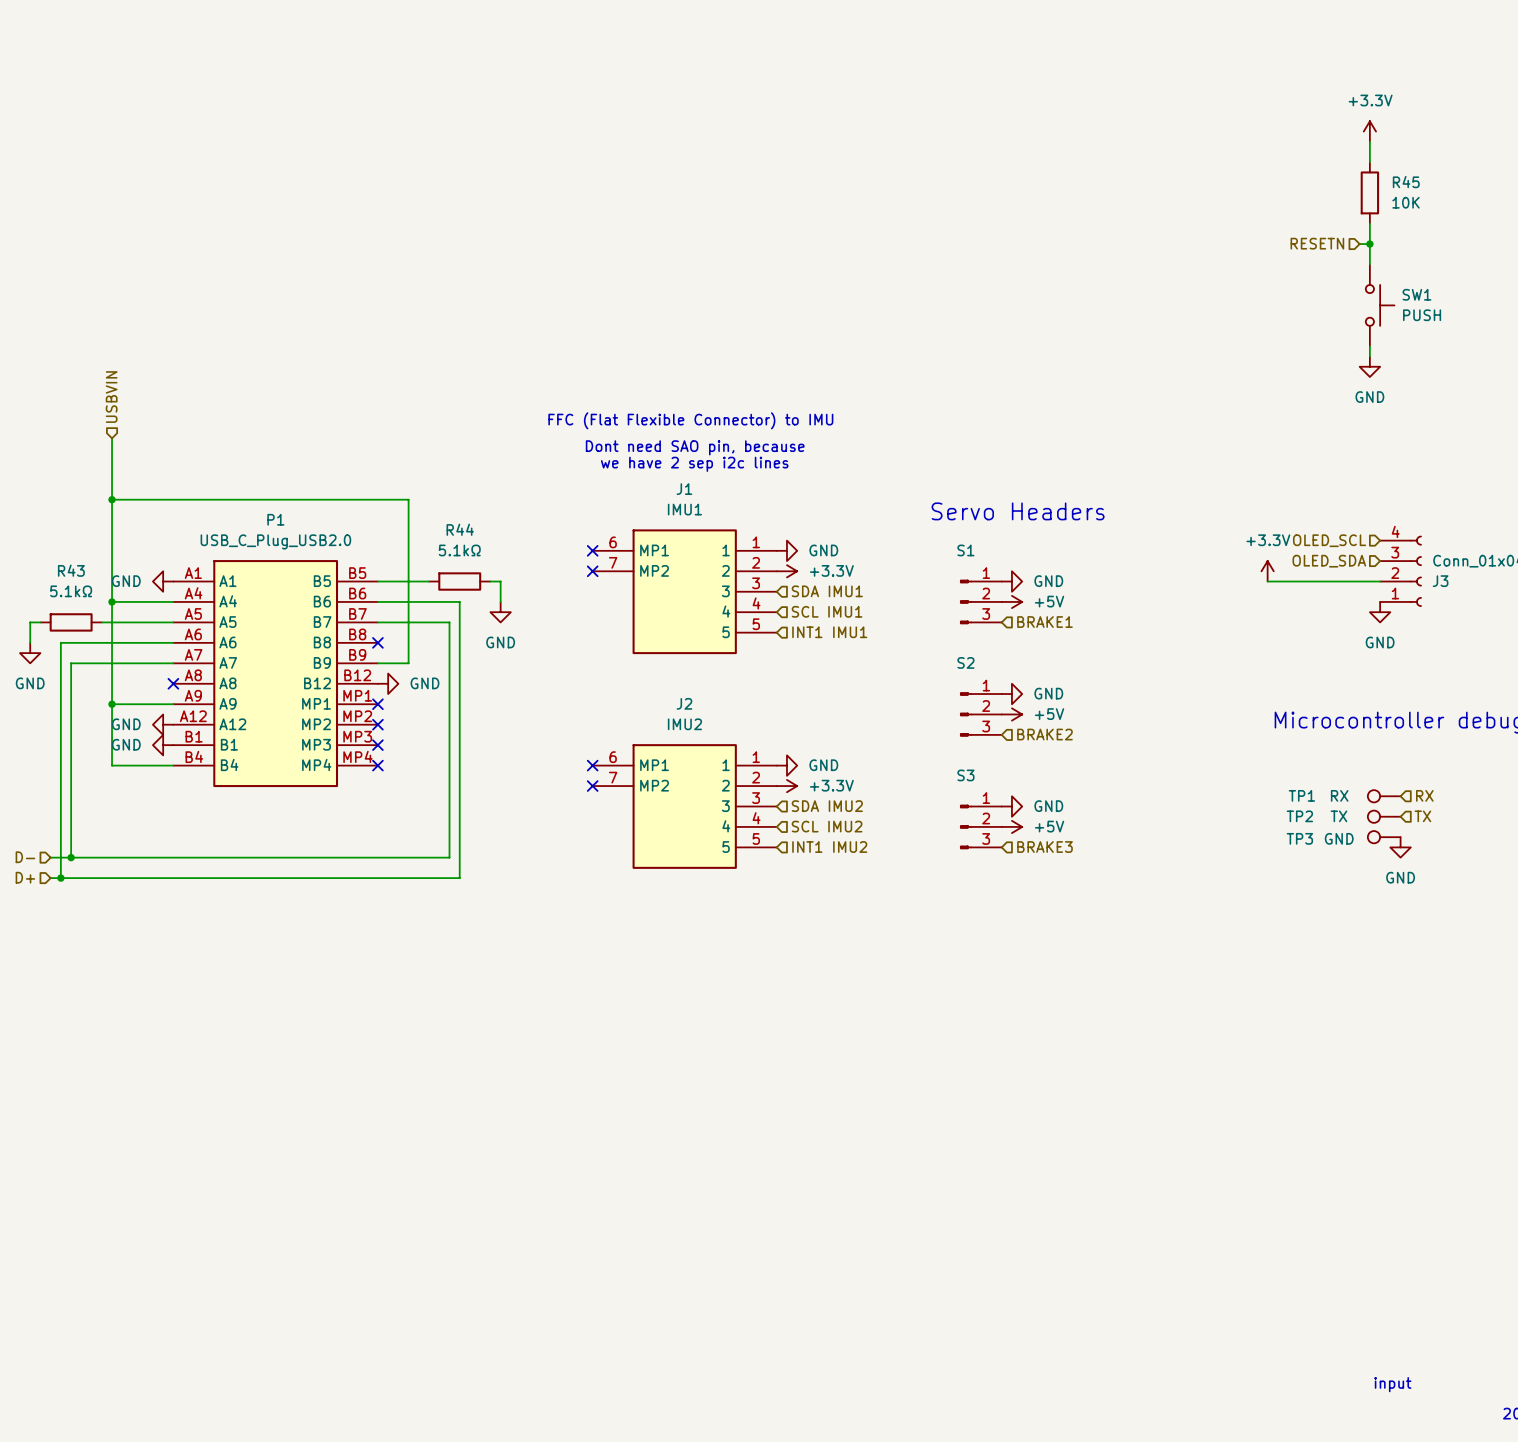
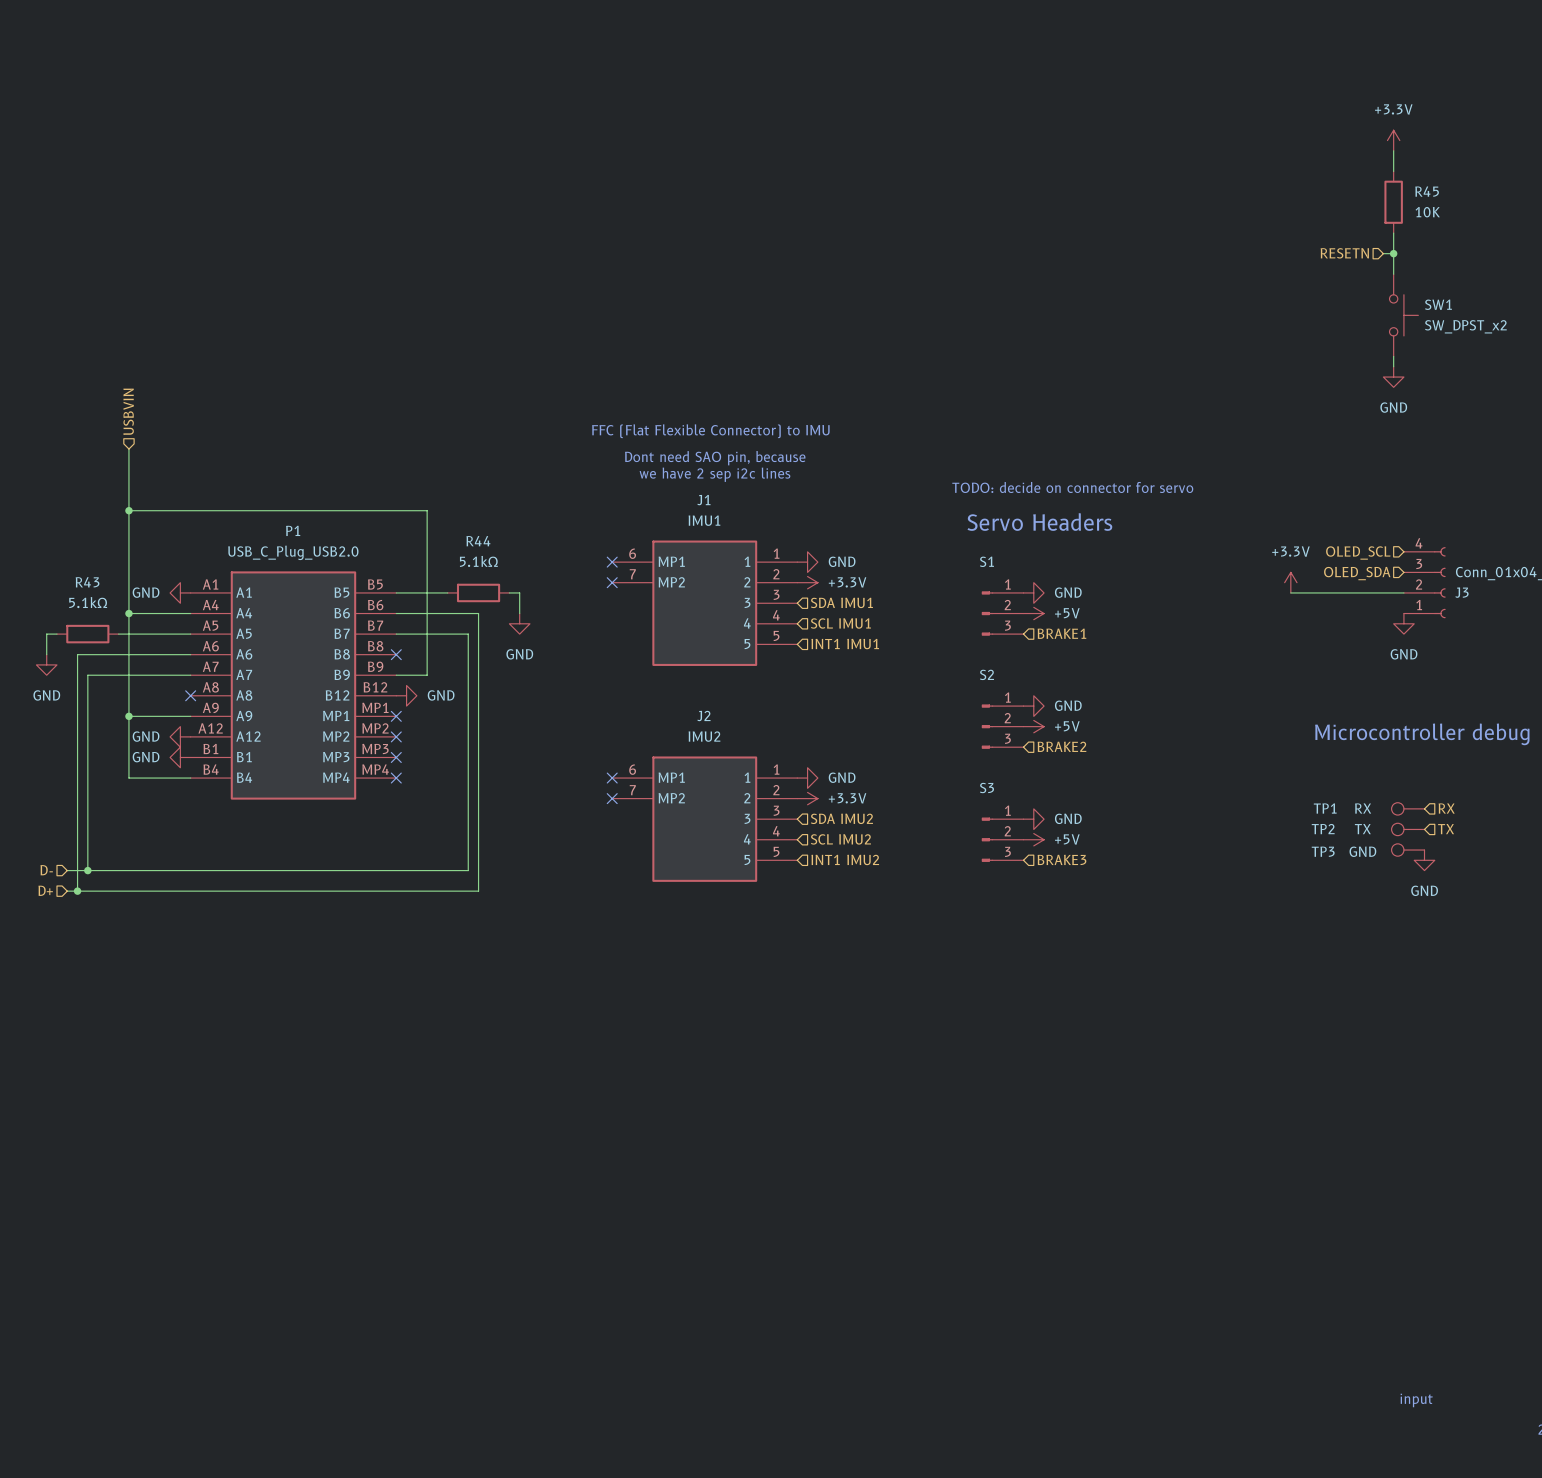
SW1 value: PUSH (1422, 315) -> SW_DPST_x2 (1465, 326)
text: none -> TODO: decide on connector for servo (1072, 487)

